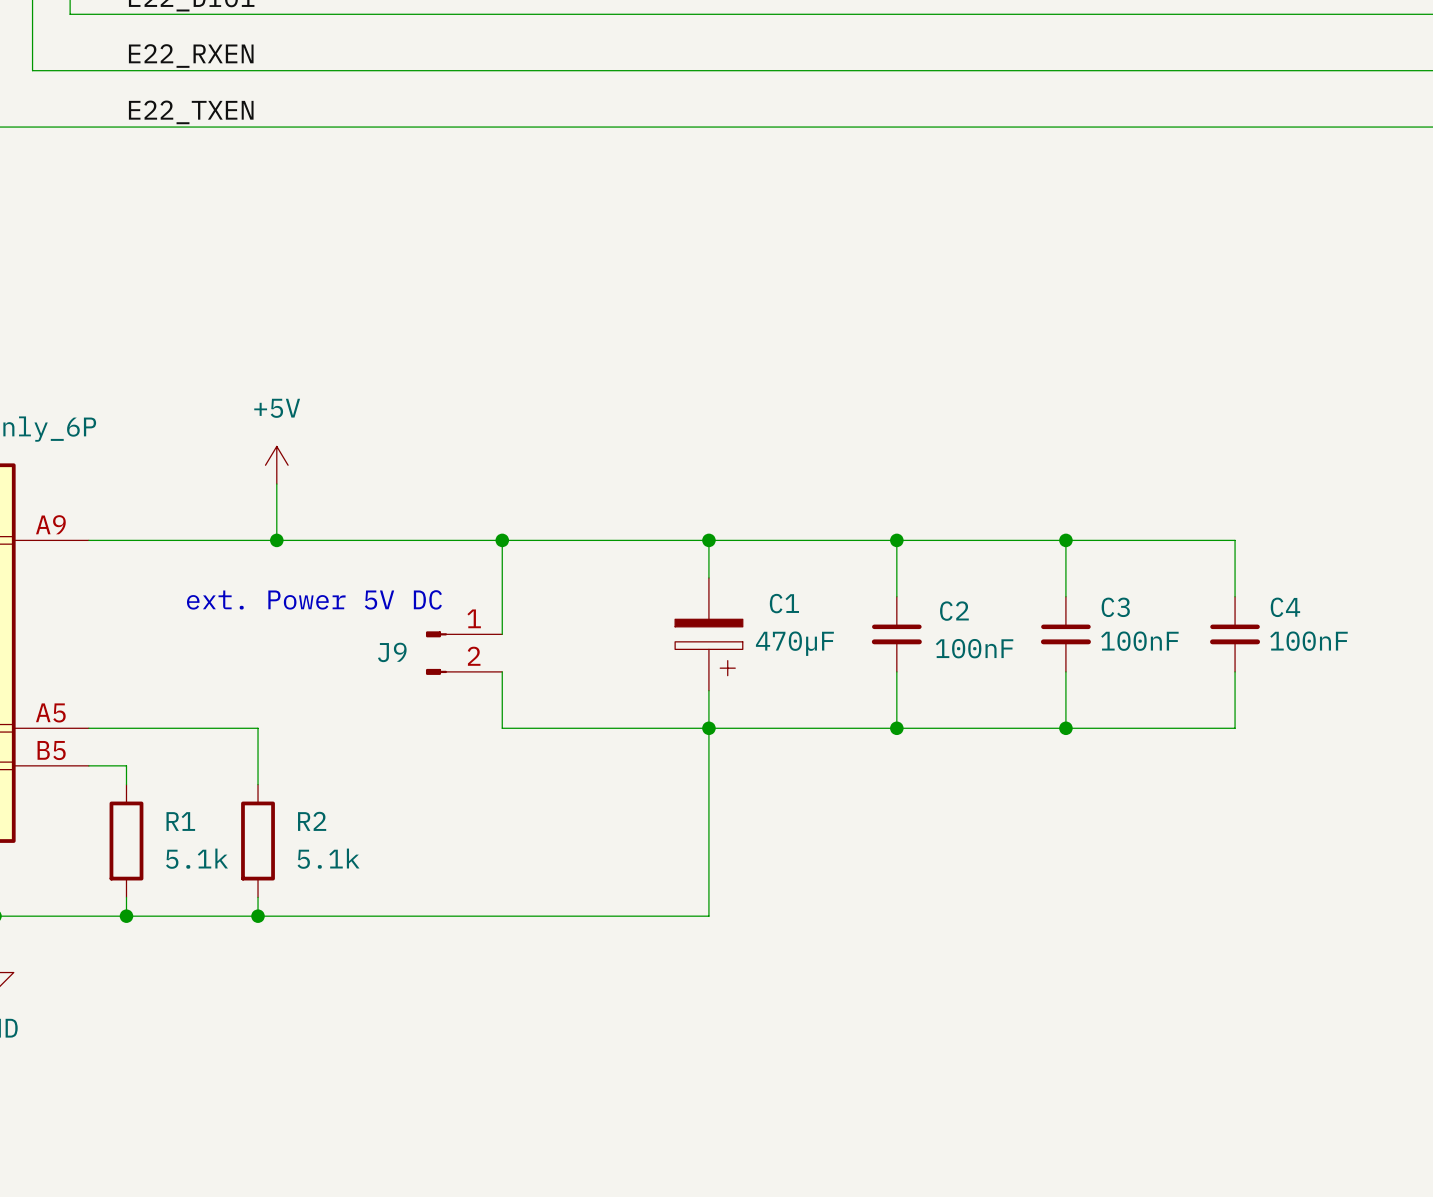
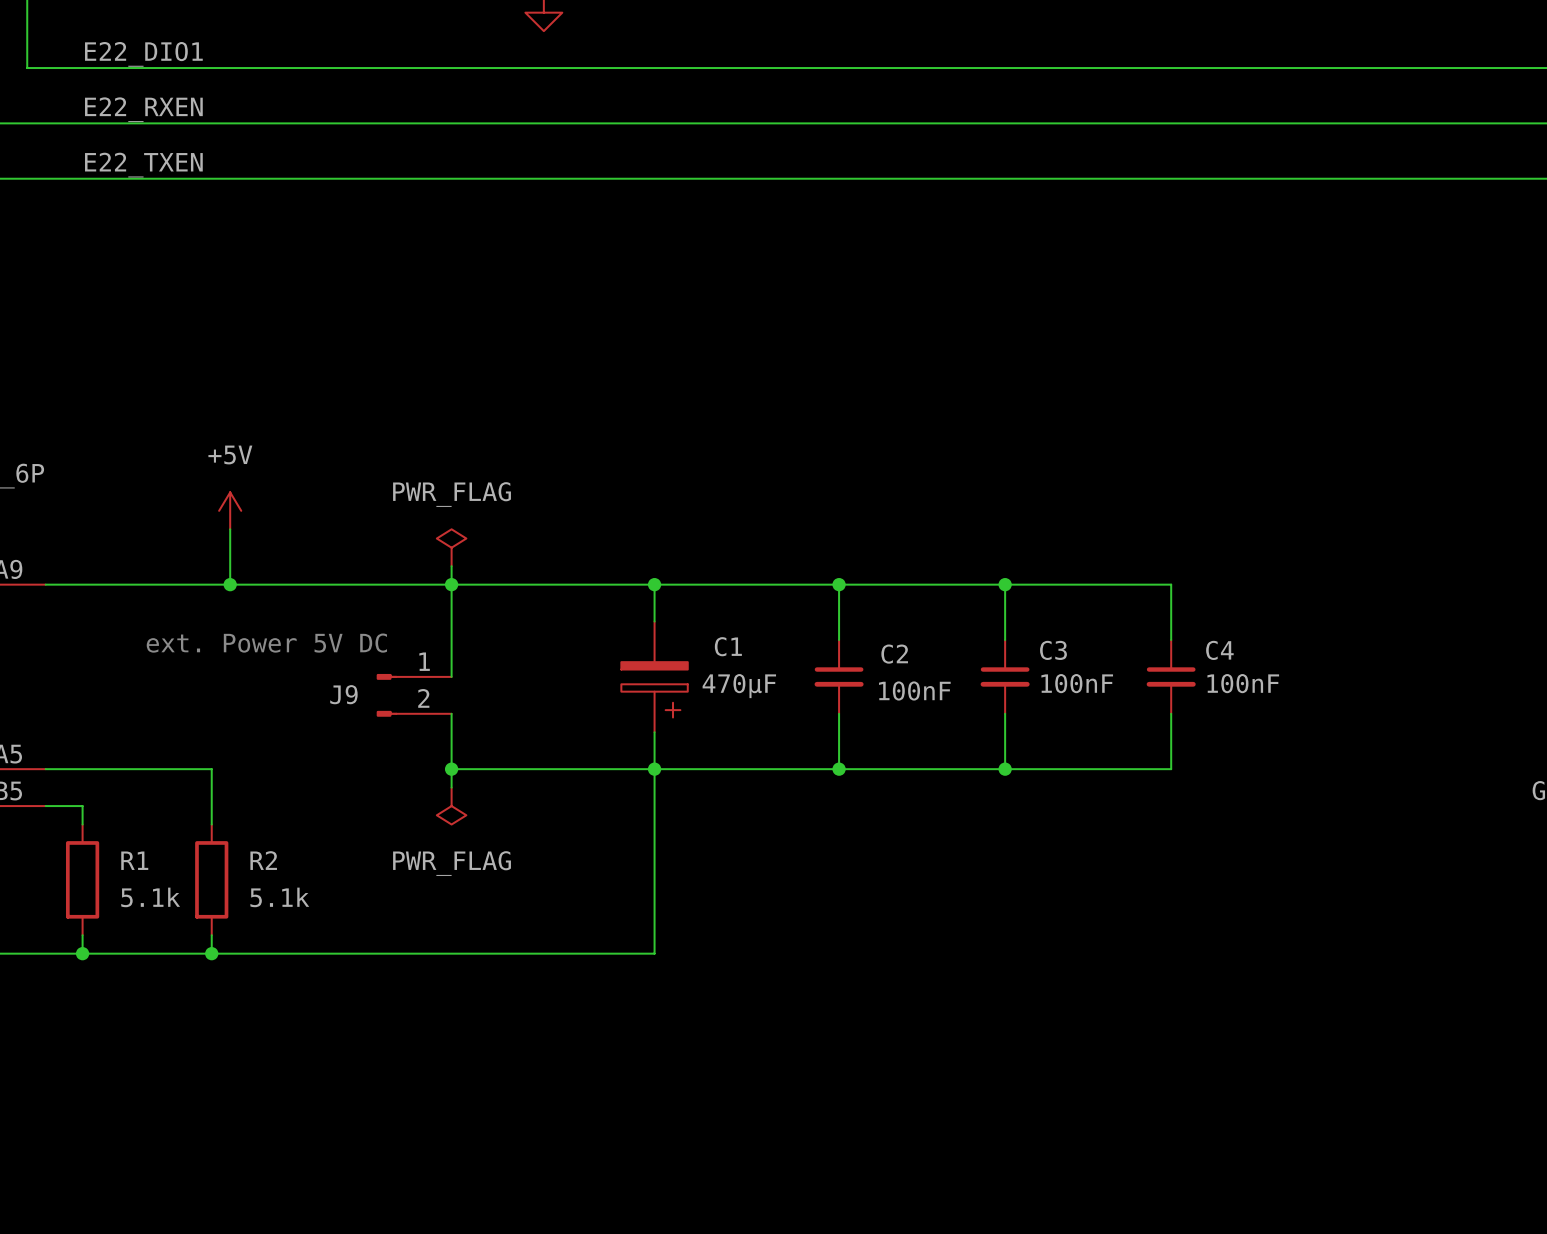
power symbol: none -> PWR_FLAG (451, 547)
wire: none -> (451, 566) (451, 584)
wire: none -> (451, 769) (451, 787)
junction: none -> (451, 769)
power symbol: none -> PWR_FLAG (451, 806)

